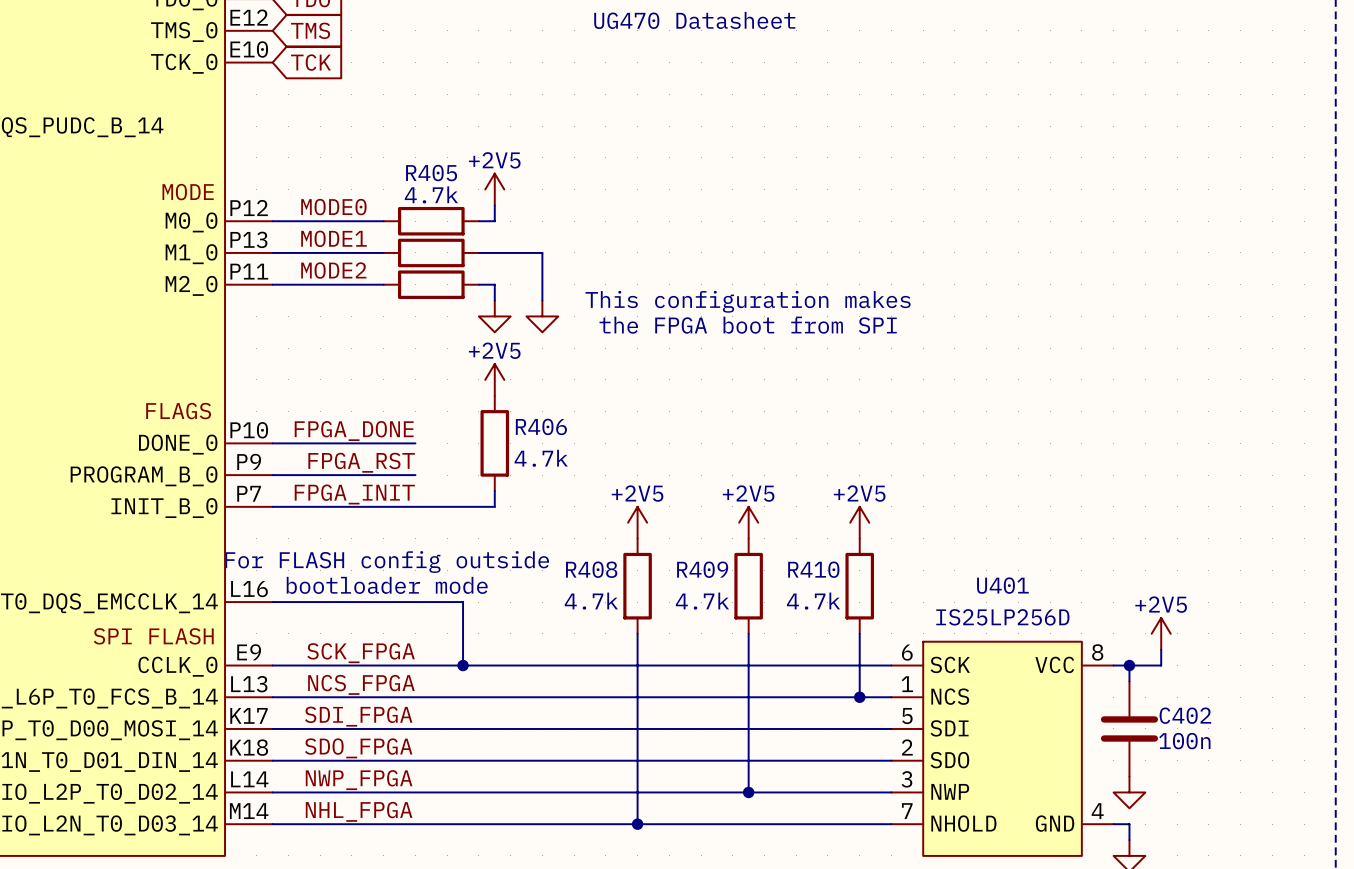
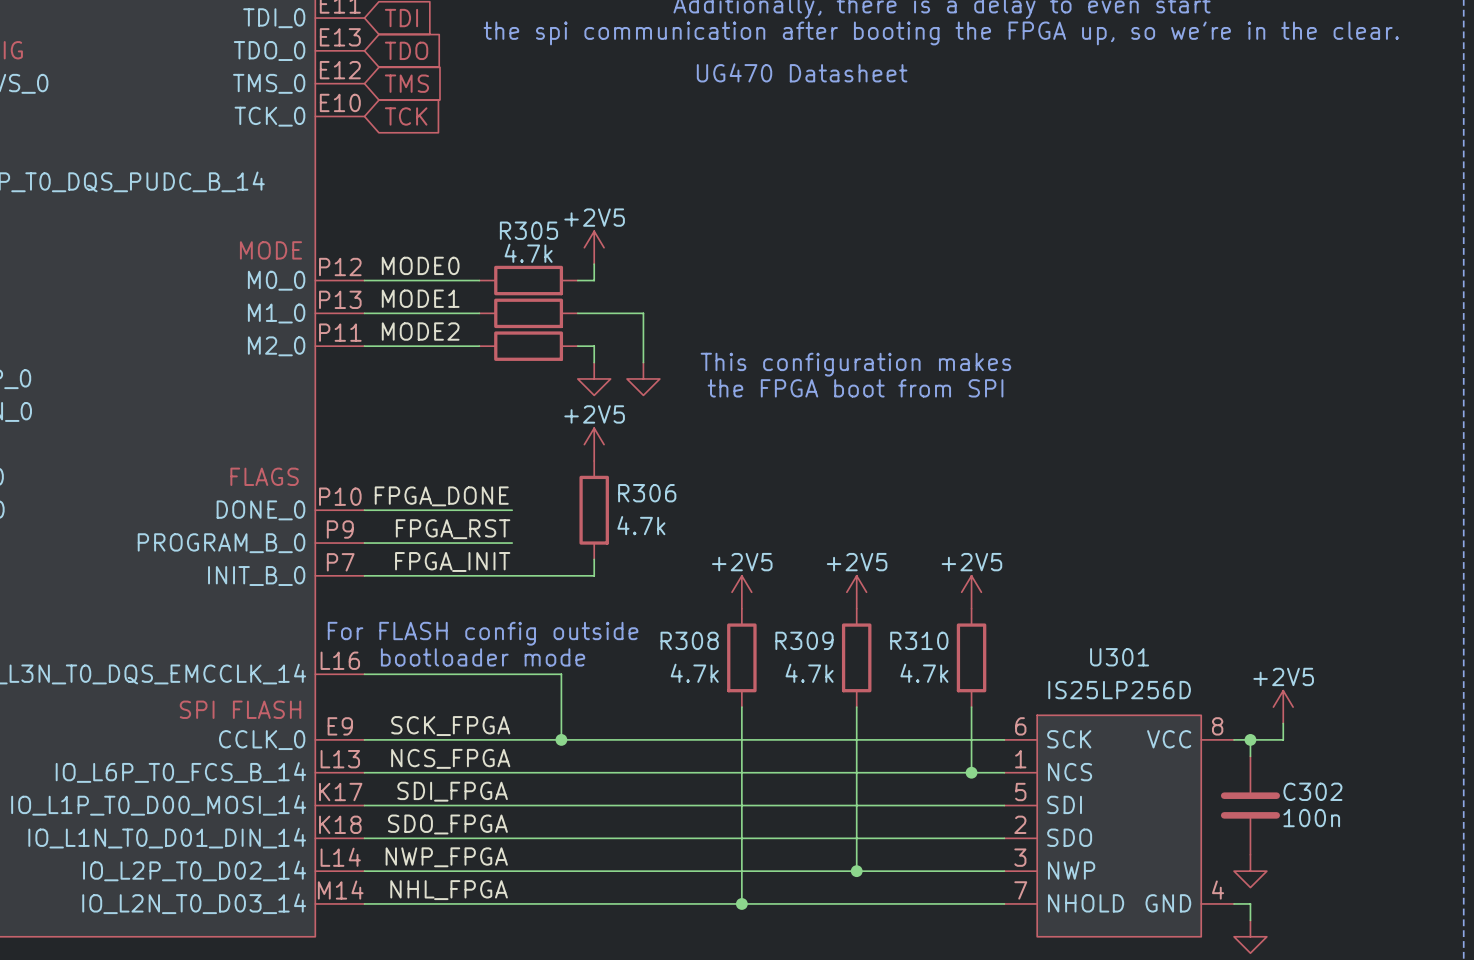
R405 name: R405 (431, 173) -> R305 (528, 230)
R406 name: R406 (541, 426) -> R306 (647, 493)
R408 name: R408 (591, 569) -> R308 (689, 640)
R409 name: R409 (702, 569) -> R309 (804, 640)
R410 name: R410 (813, 569) -> R310 (919, 640)
U401 name: U401 (1002, 585) -> U301 (1119, 657)
C402 name: C402 (1185, 715) -> C302 (1312, 791)

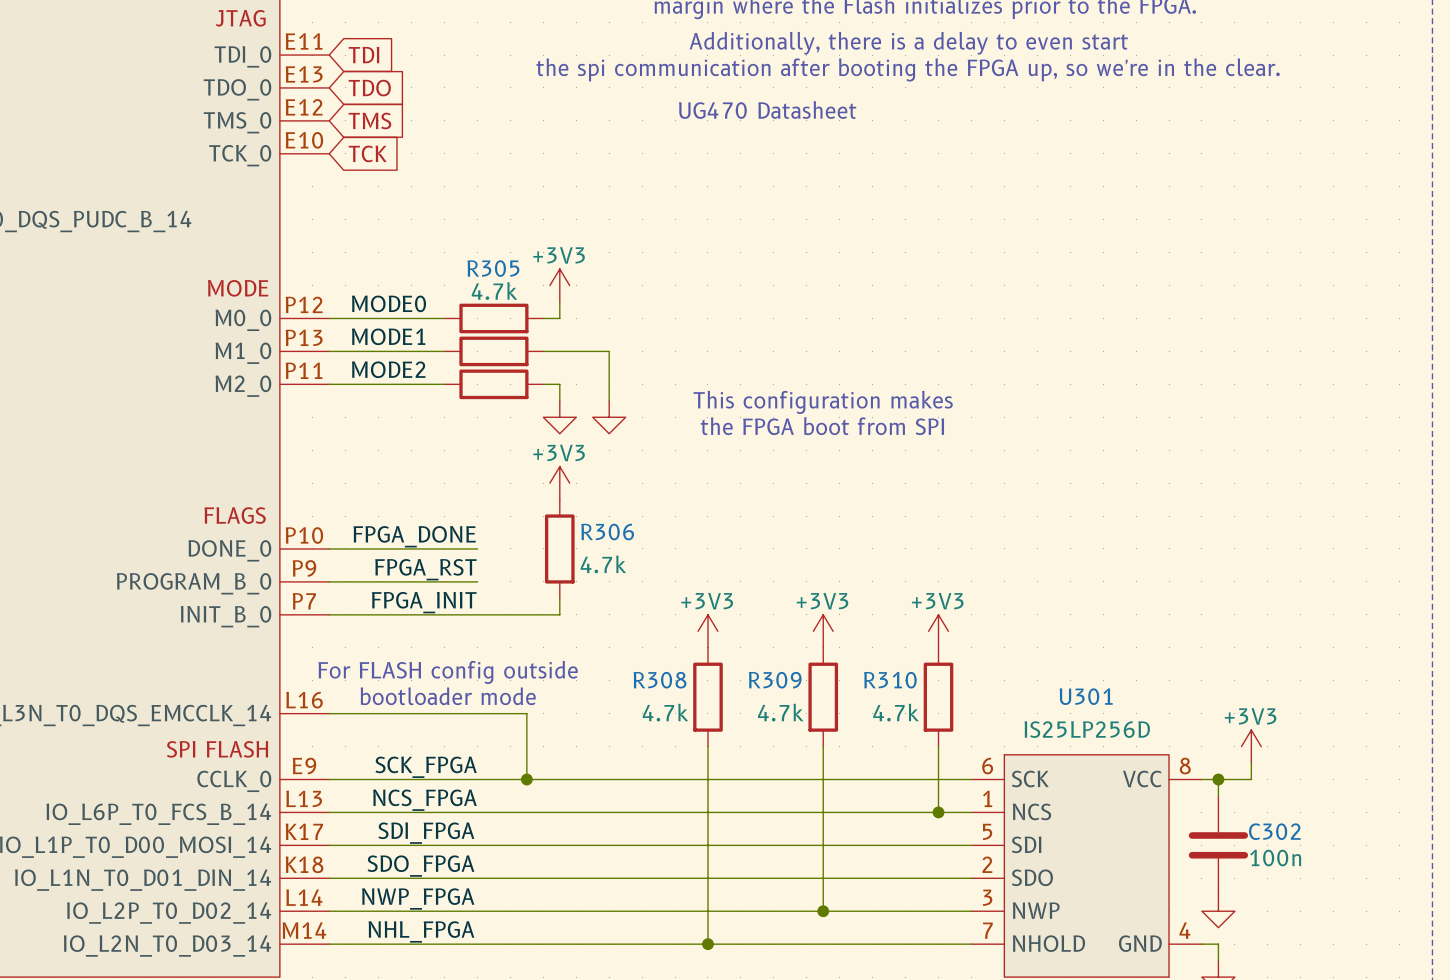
power symbol: +2V5 (594, 247) -> +3V3 (559, 285)
power symbol: +2V5 (594, 444) -> +3V3 (559, 483)
power symbol: +2V5 (741, 592) -> +3V3 (707, 631)
power symbol: +2V5 (856, 592) -> +3V3 (823, 631)
power symbol: +2V5 (971, 592) -> +3V3 (938, 631)
power symbol: +2V5 (1283, 707) -> +3V3 (1251, 746)

